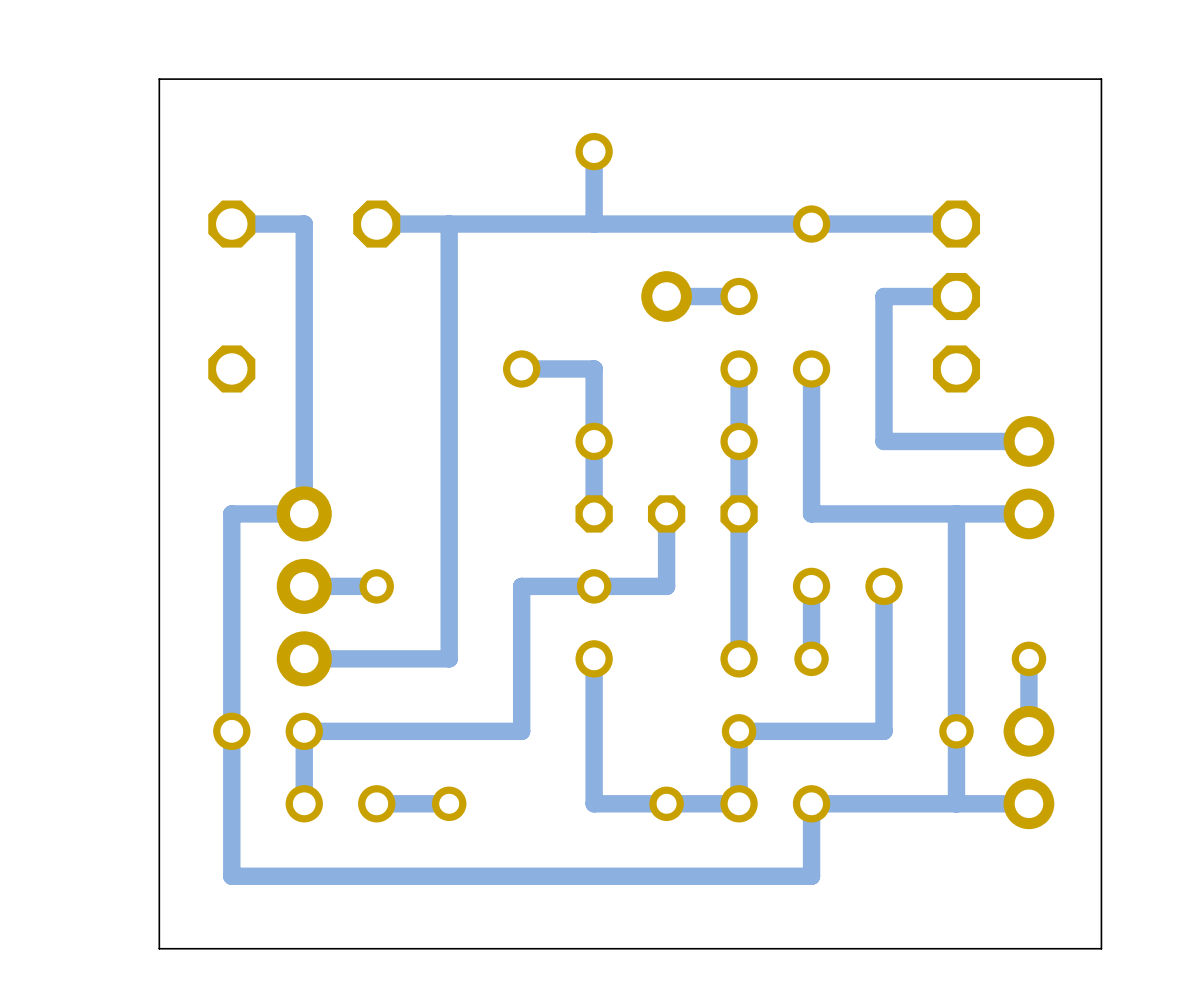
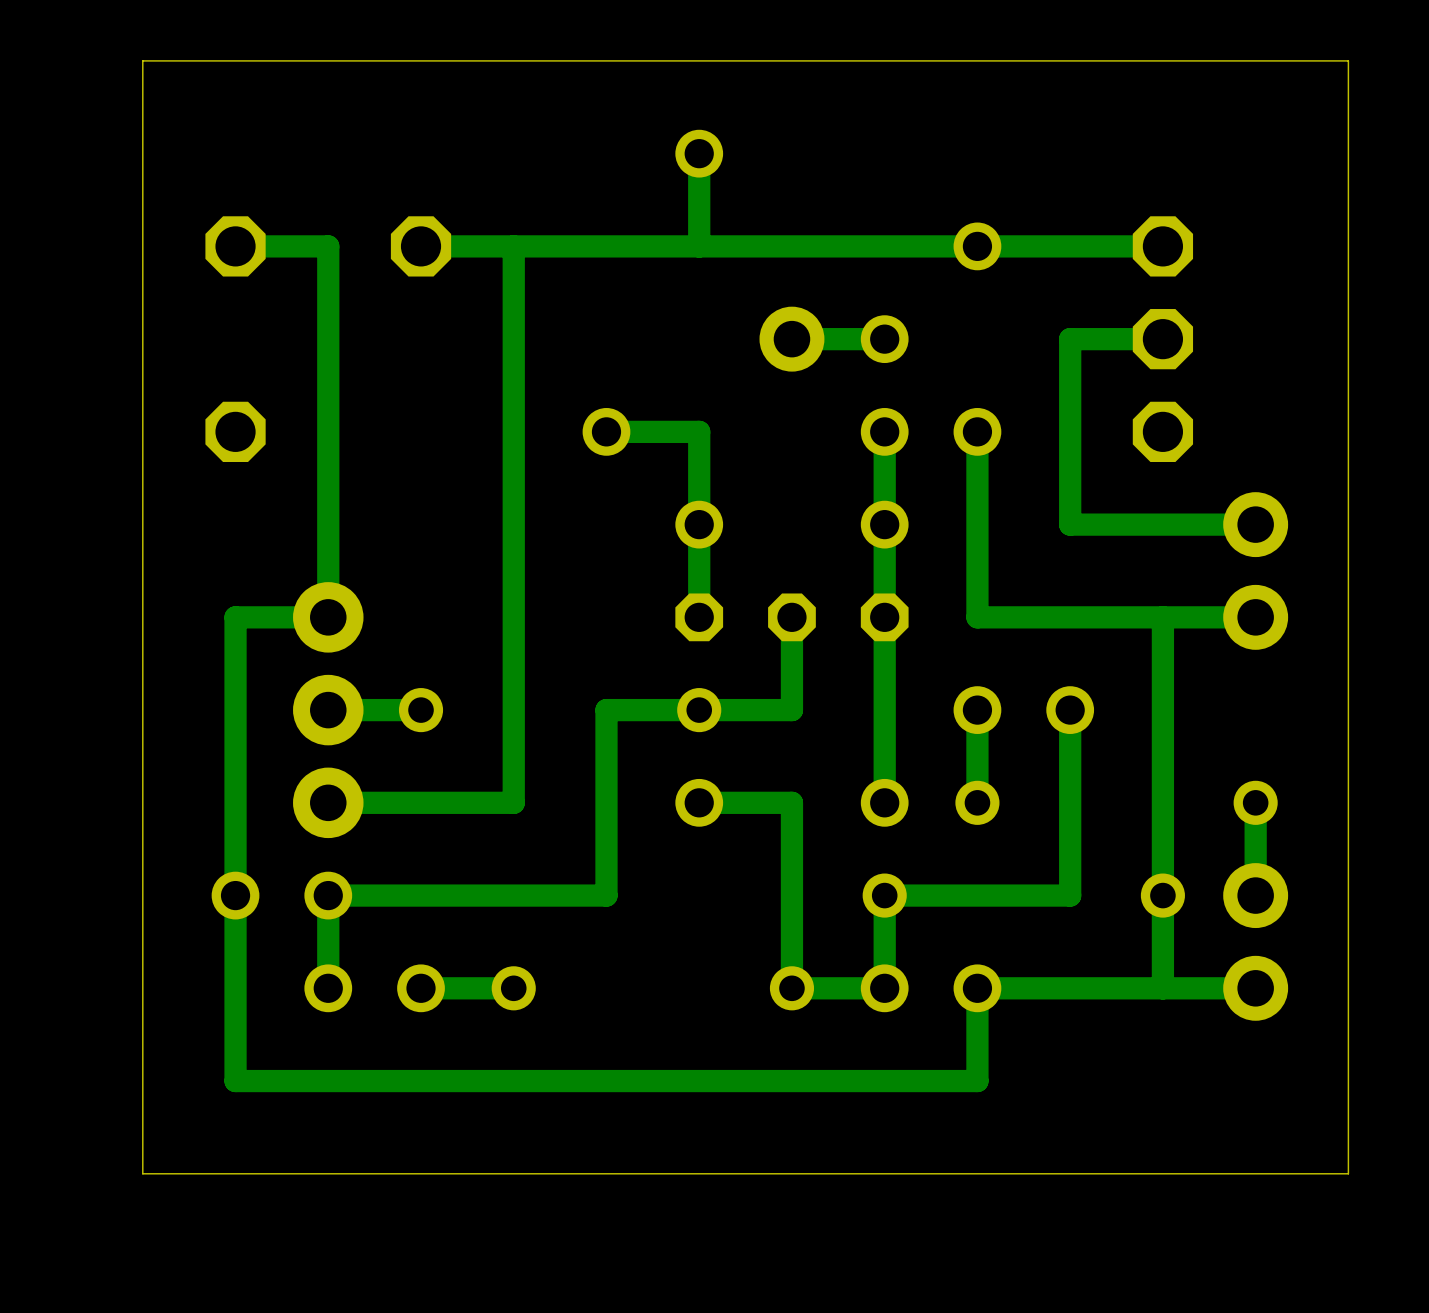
track: (594, 658) (594, 803) (666, 803) -> (699, 802) (791, 802) (791, 988)

